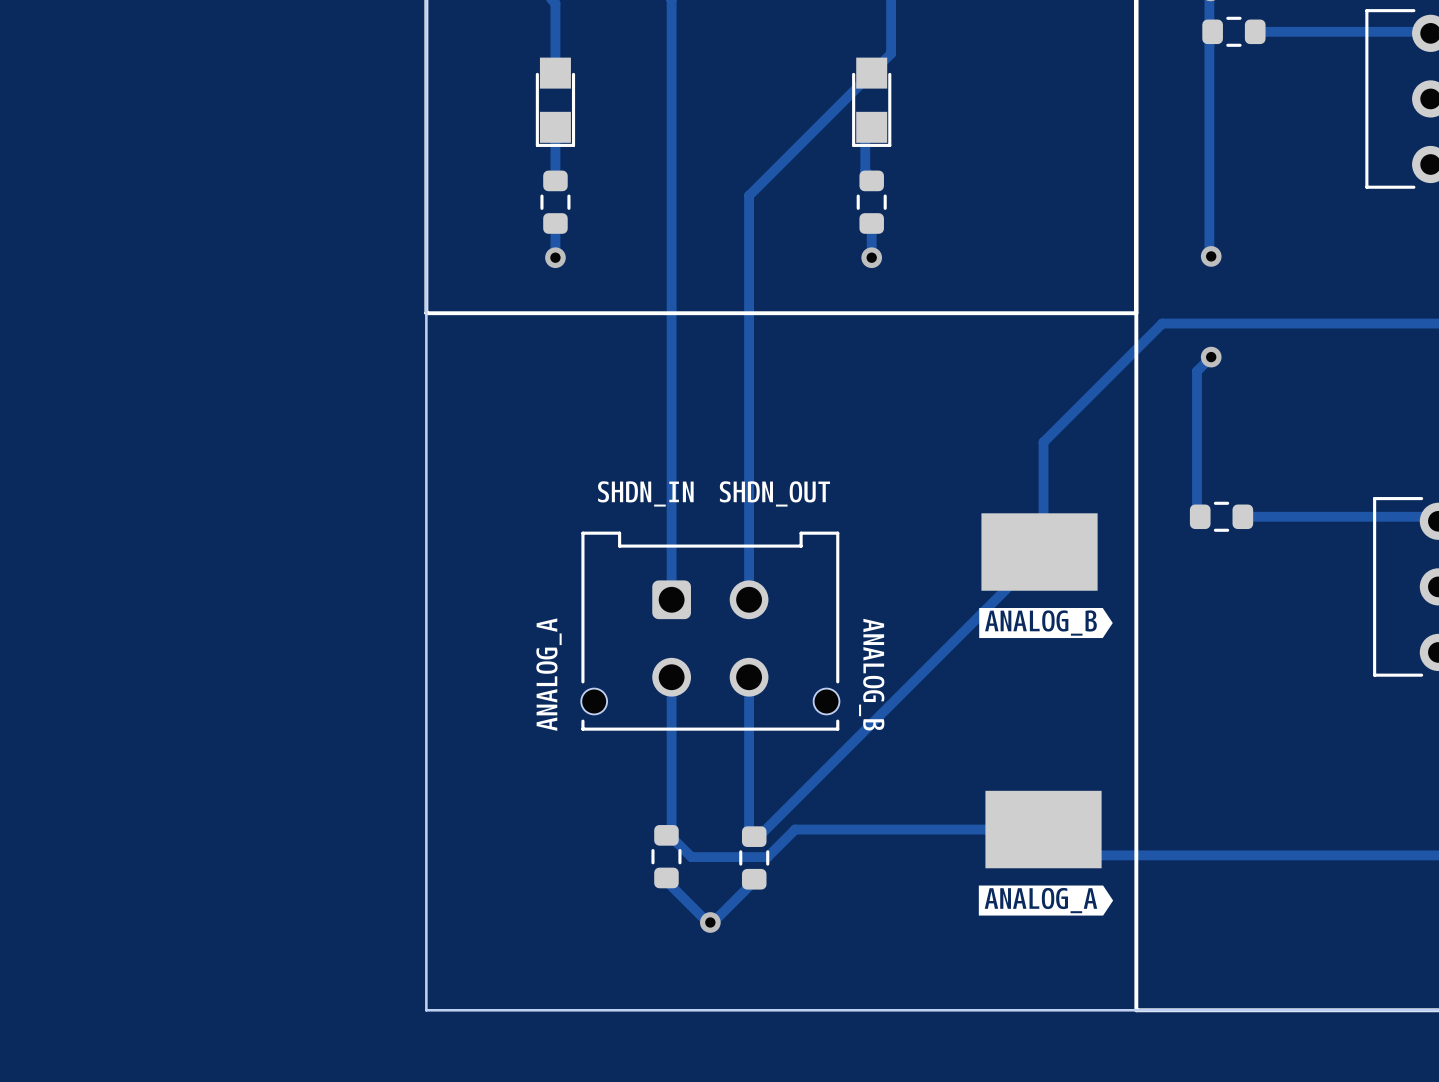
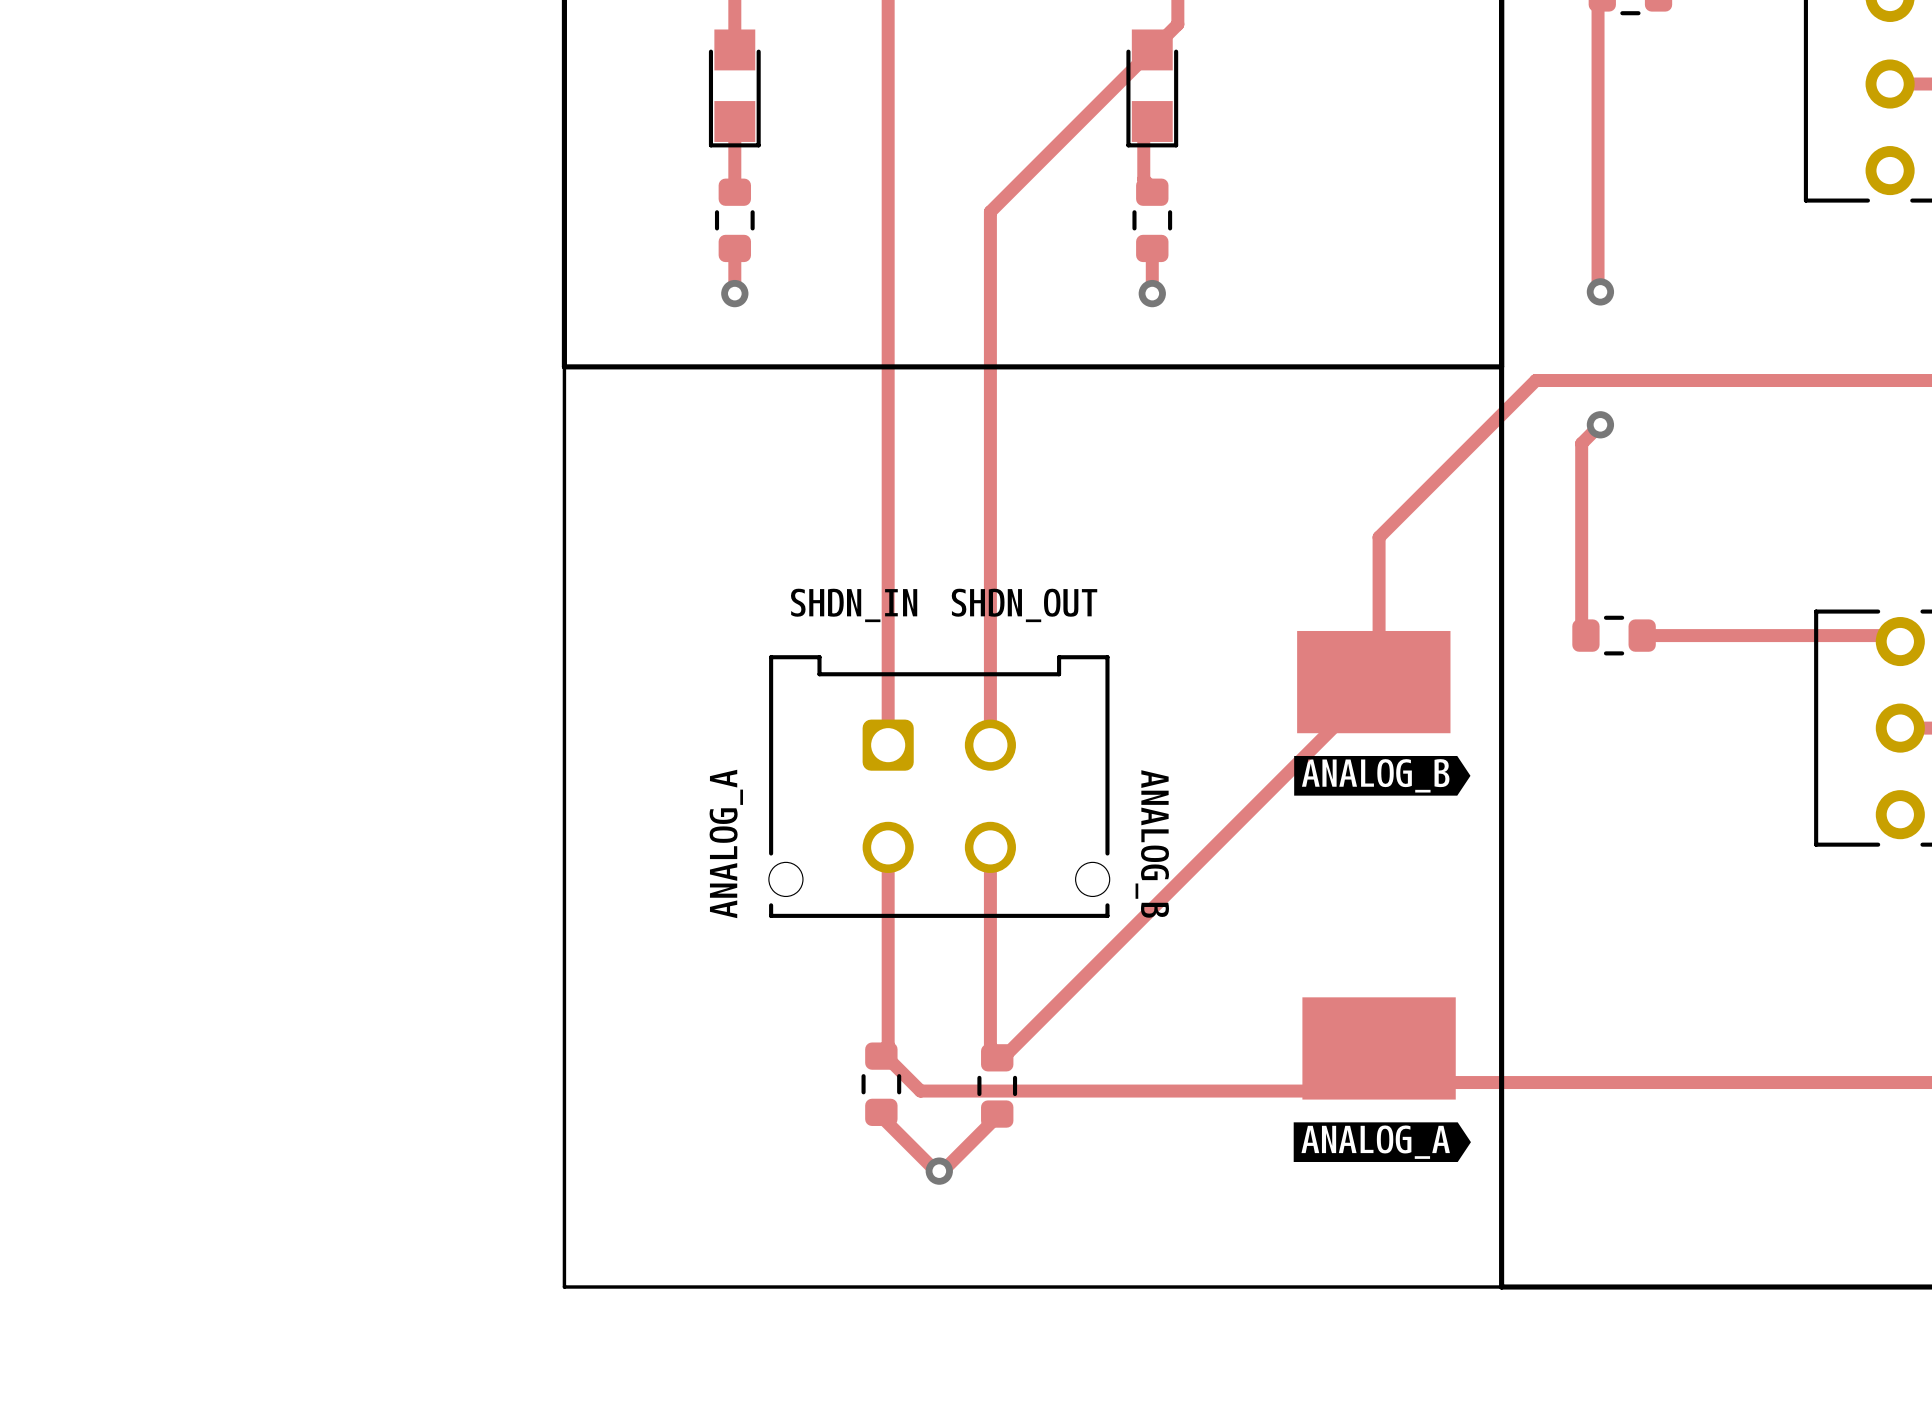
track: (1043, 829) (795, 829) (767, 857) (691, 857) -> (1379, 1048) (1336, 1091) (920, 1091) (914, 1084)

